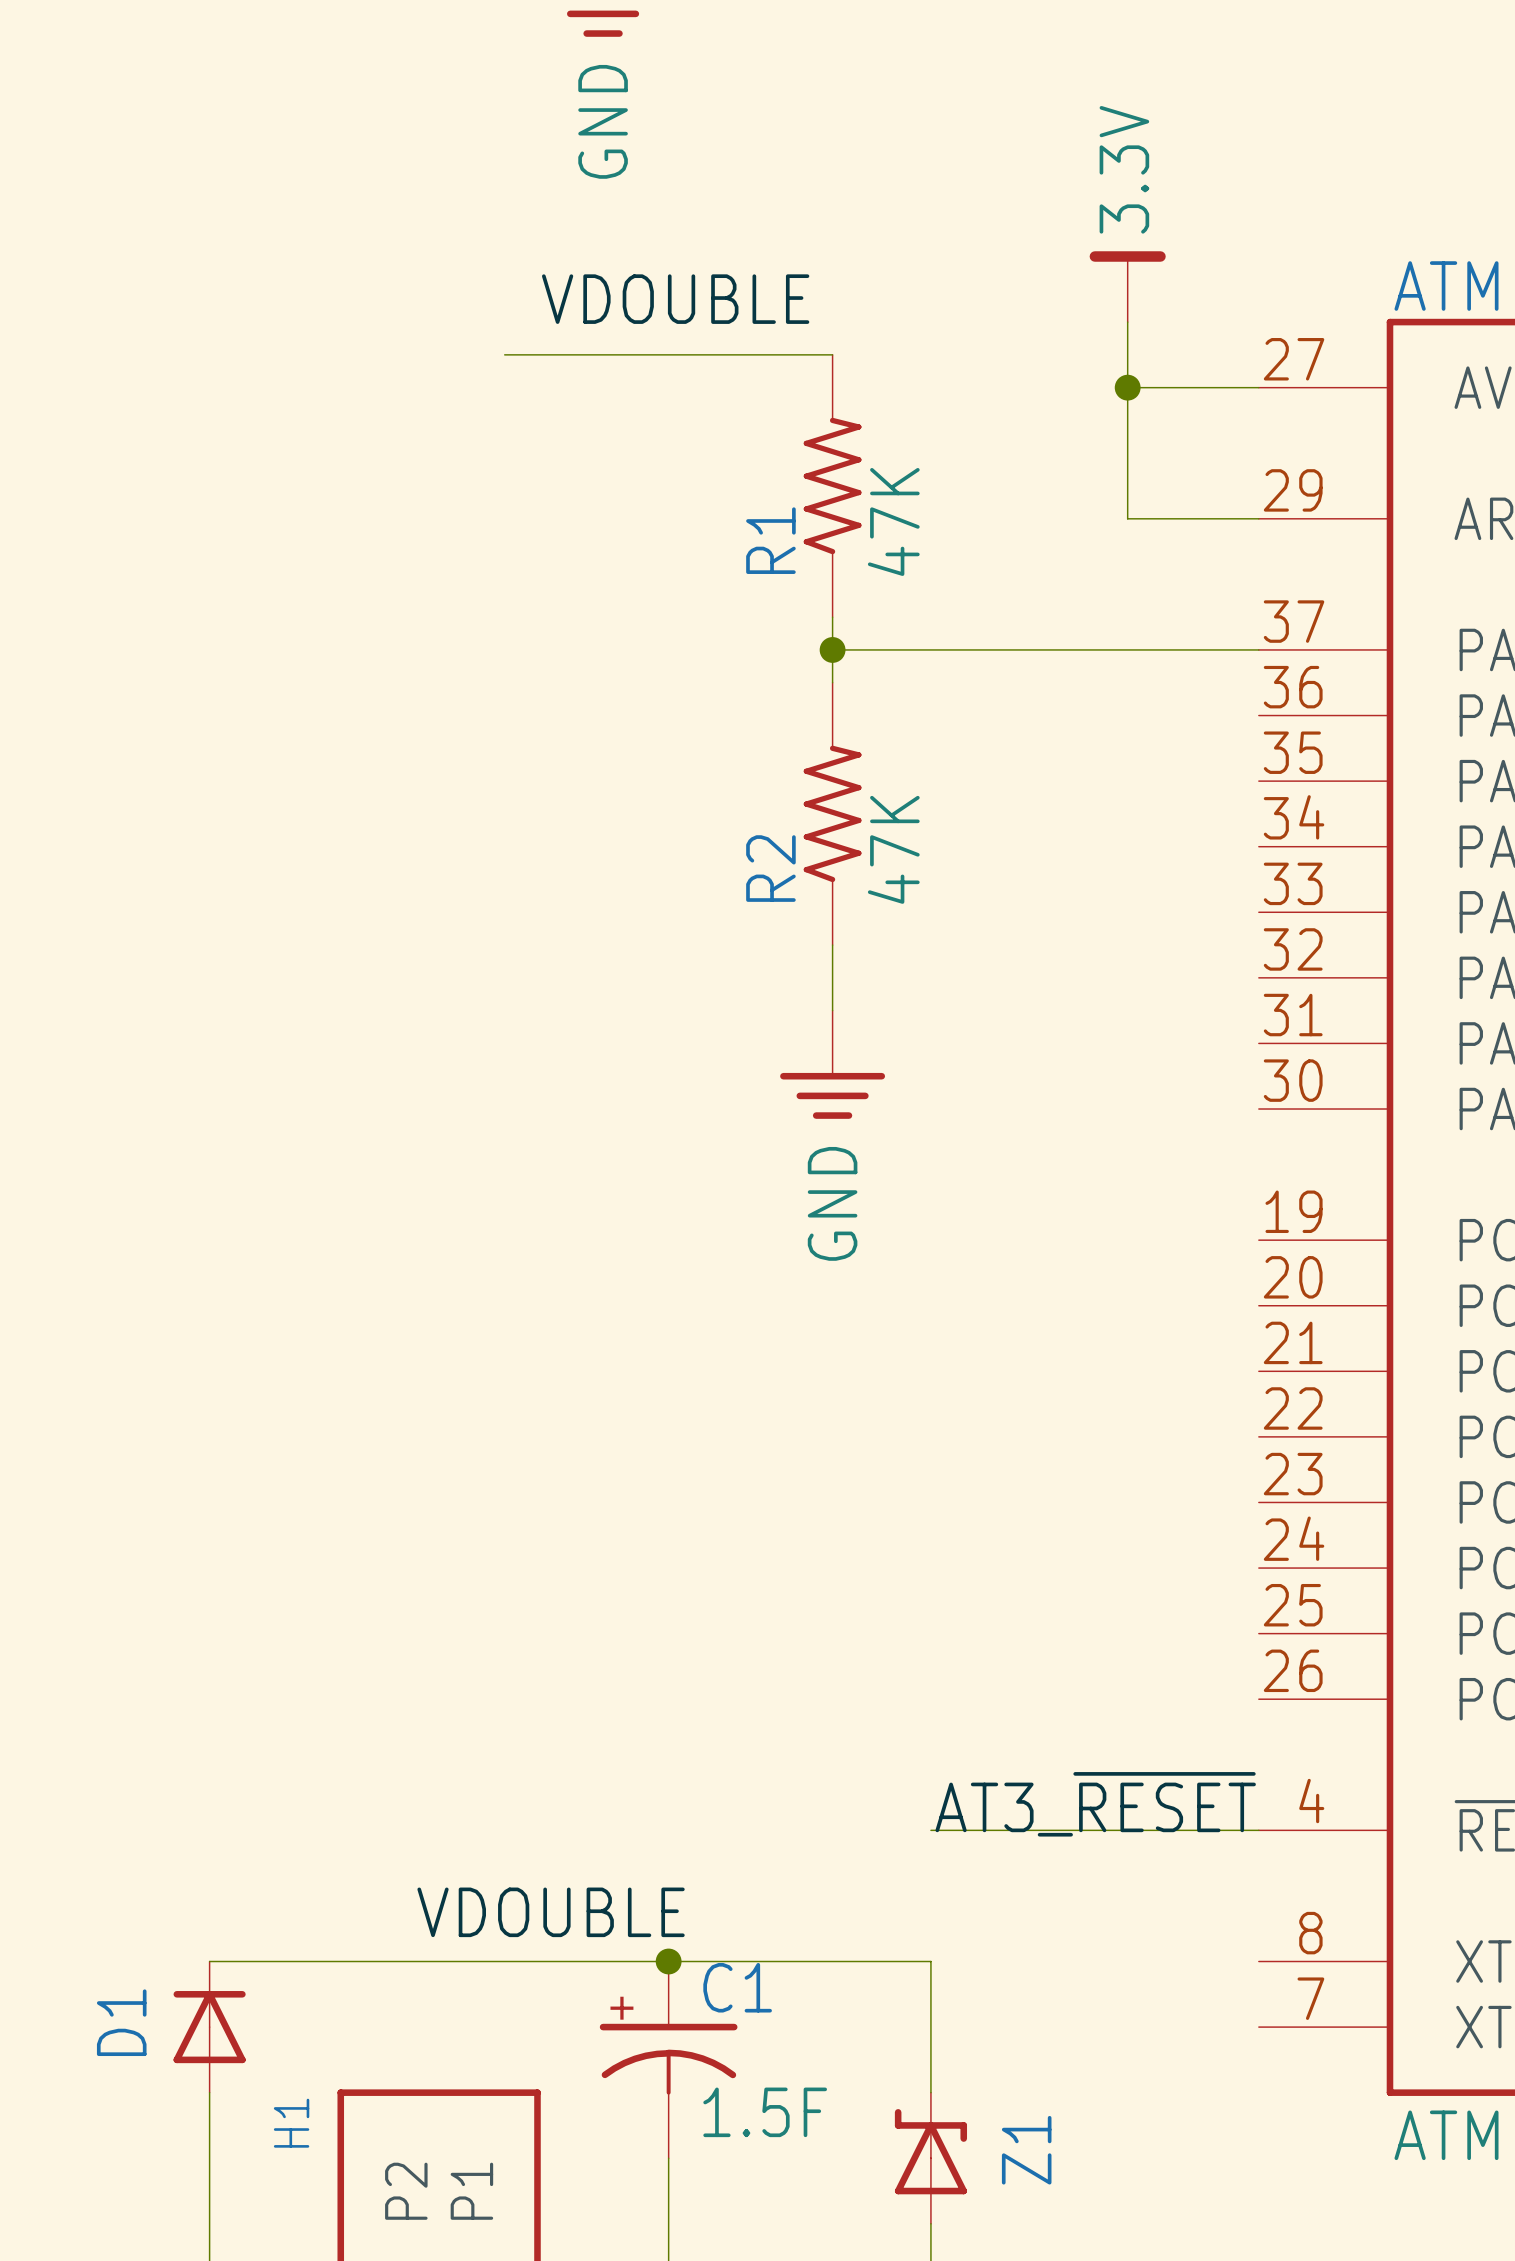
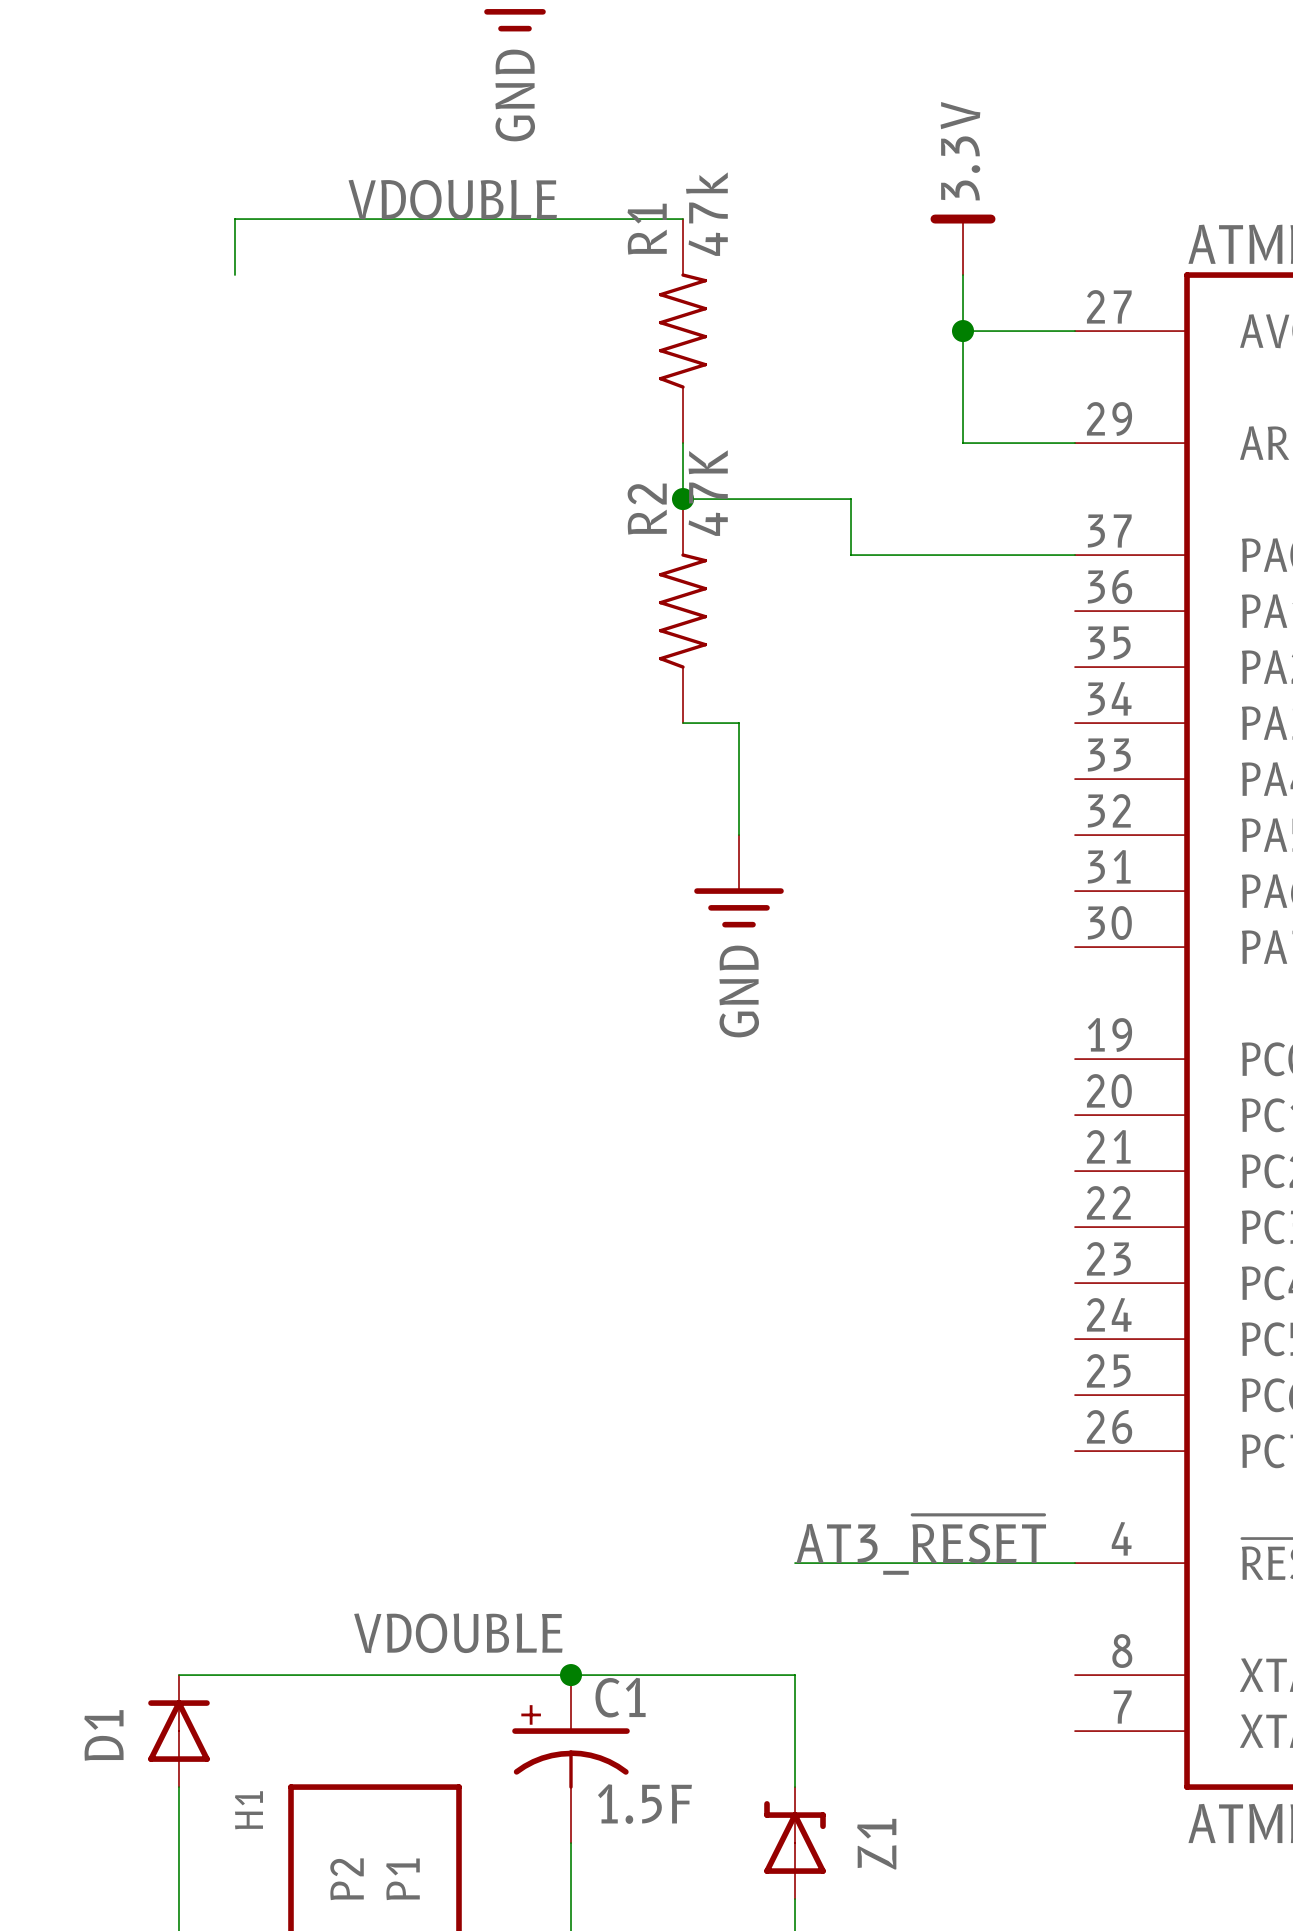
wire: none -> (683, 219) (234, 219) (234, 275)
label position: VDOUBLE (675, 299) -> VDOUBLE (452, 199)
wire: (504, 354) (832, 354) -> none
R1 symbol: [803, 354, 862, 618] -> [658, 219, 708, 444]
R1 value: 47K (893, 521) -> 47k (706, 214)
R1 name position: R1 (770, 540) -> R1 (647, 229)
wire: (832, 617) (832, 682) -> none
wire: (832, 649) (996, 649) -> (683, 443) (683, 499) (851, 499) (851, 555)
junction position: (832, 649) -> (683, 499)
R2 symbol: [803, 682, 862, 946] -> [658, 499, 708, 724]
wire: none -> (683, 723) (739, 723) (739, 835)
R2 value position: 47K (893, 849) -> 47K (708, 493)
R2 name position: R2 (770, 868) -> R2 (647, 509)
wire: (832, 945) (832, 1010) -> none
power symbol position: GND (832, 1064) -> GND (739, 881)

